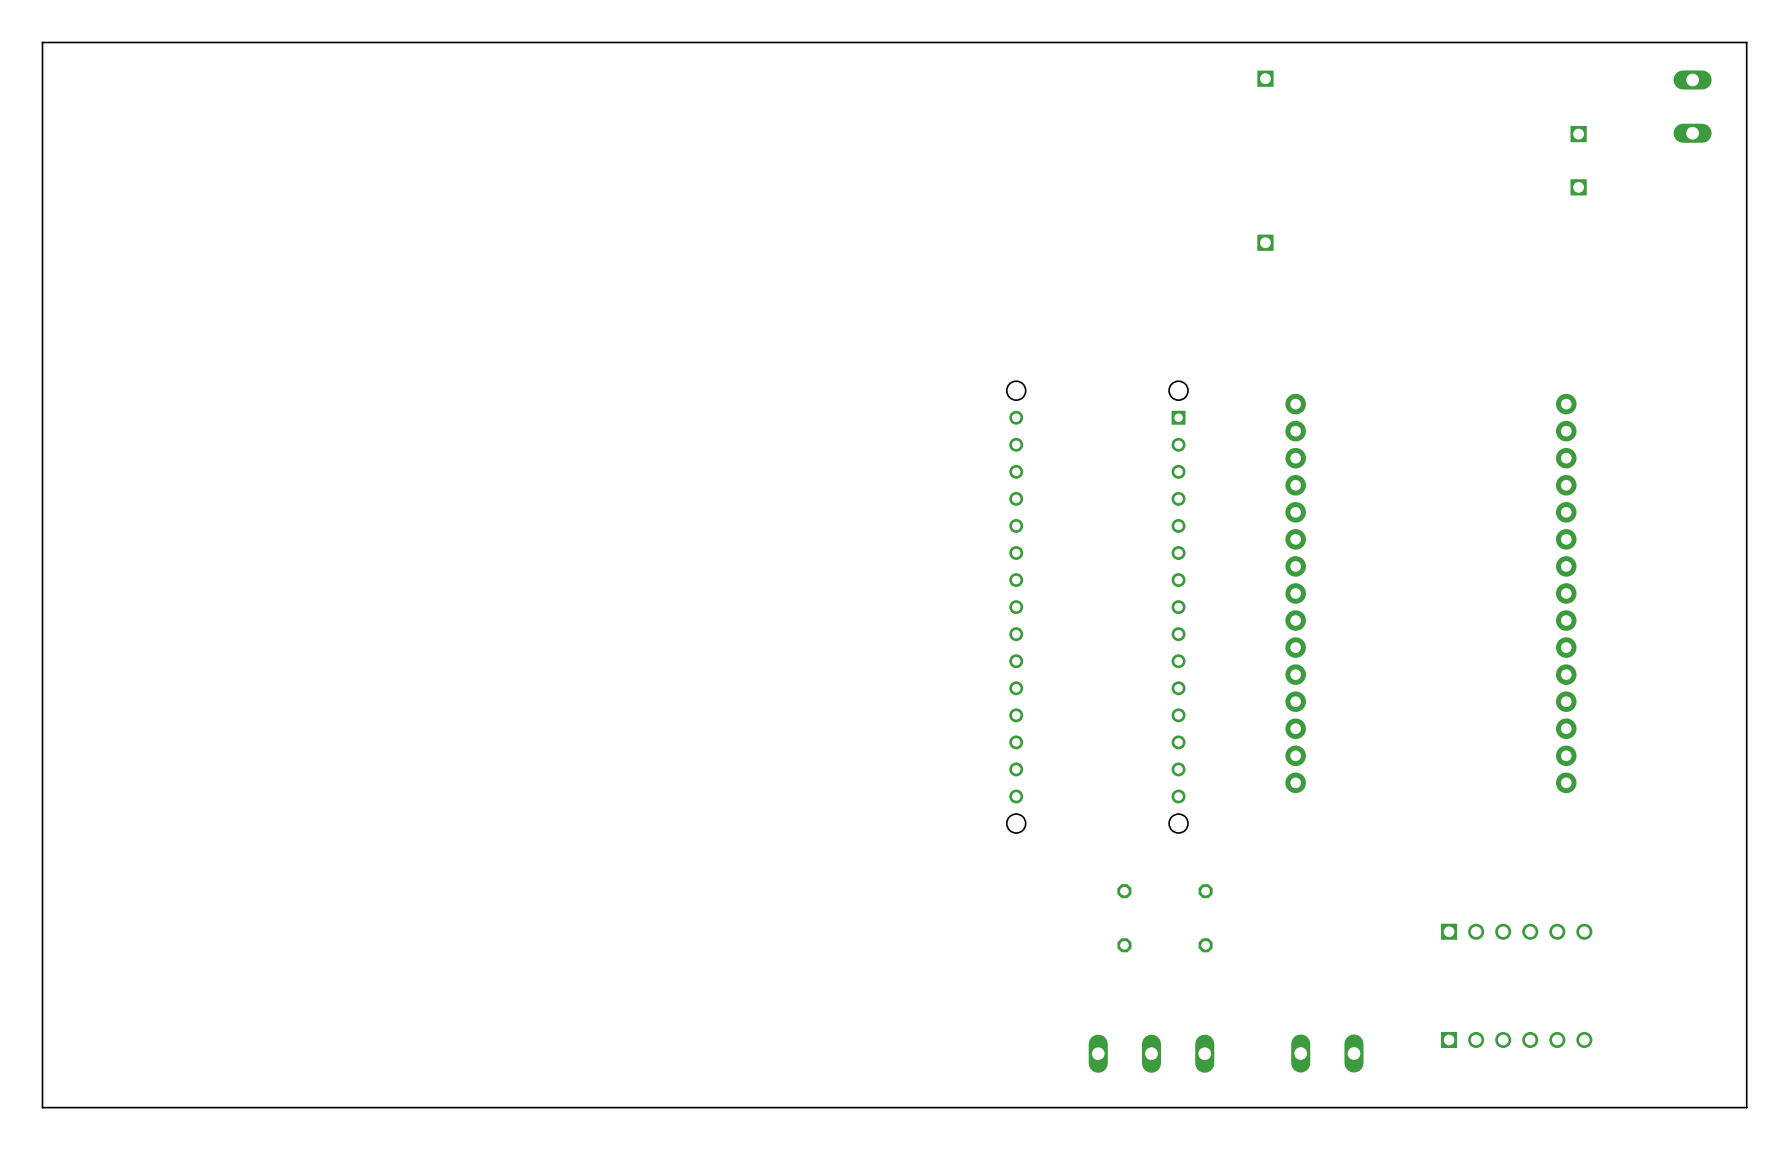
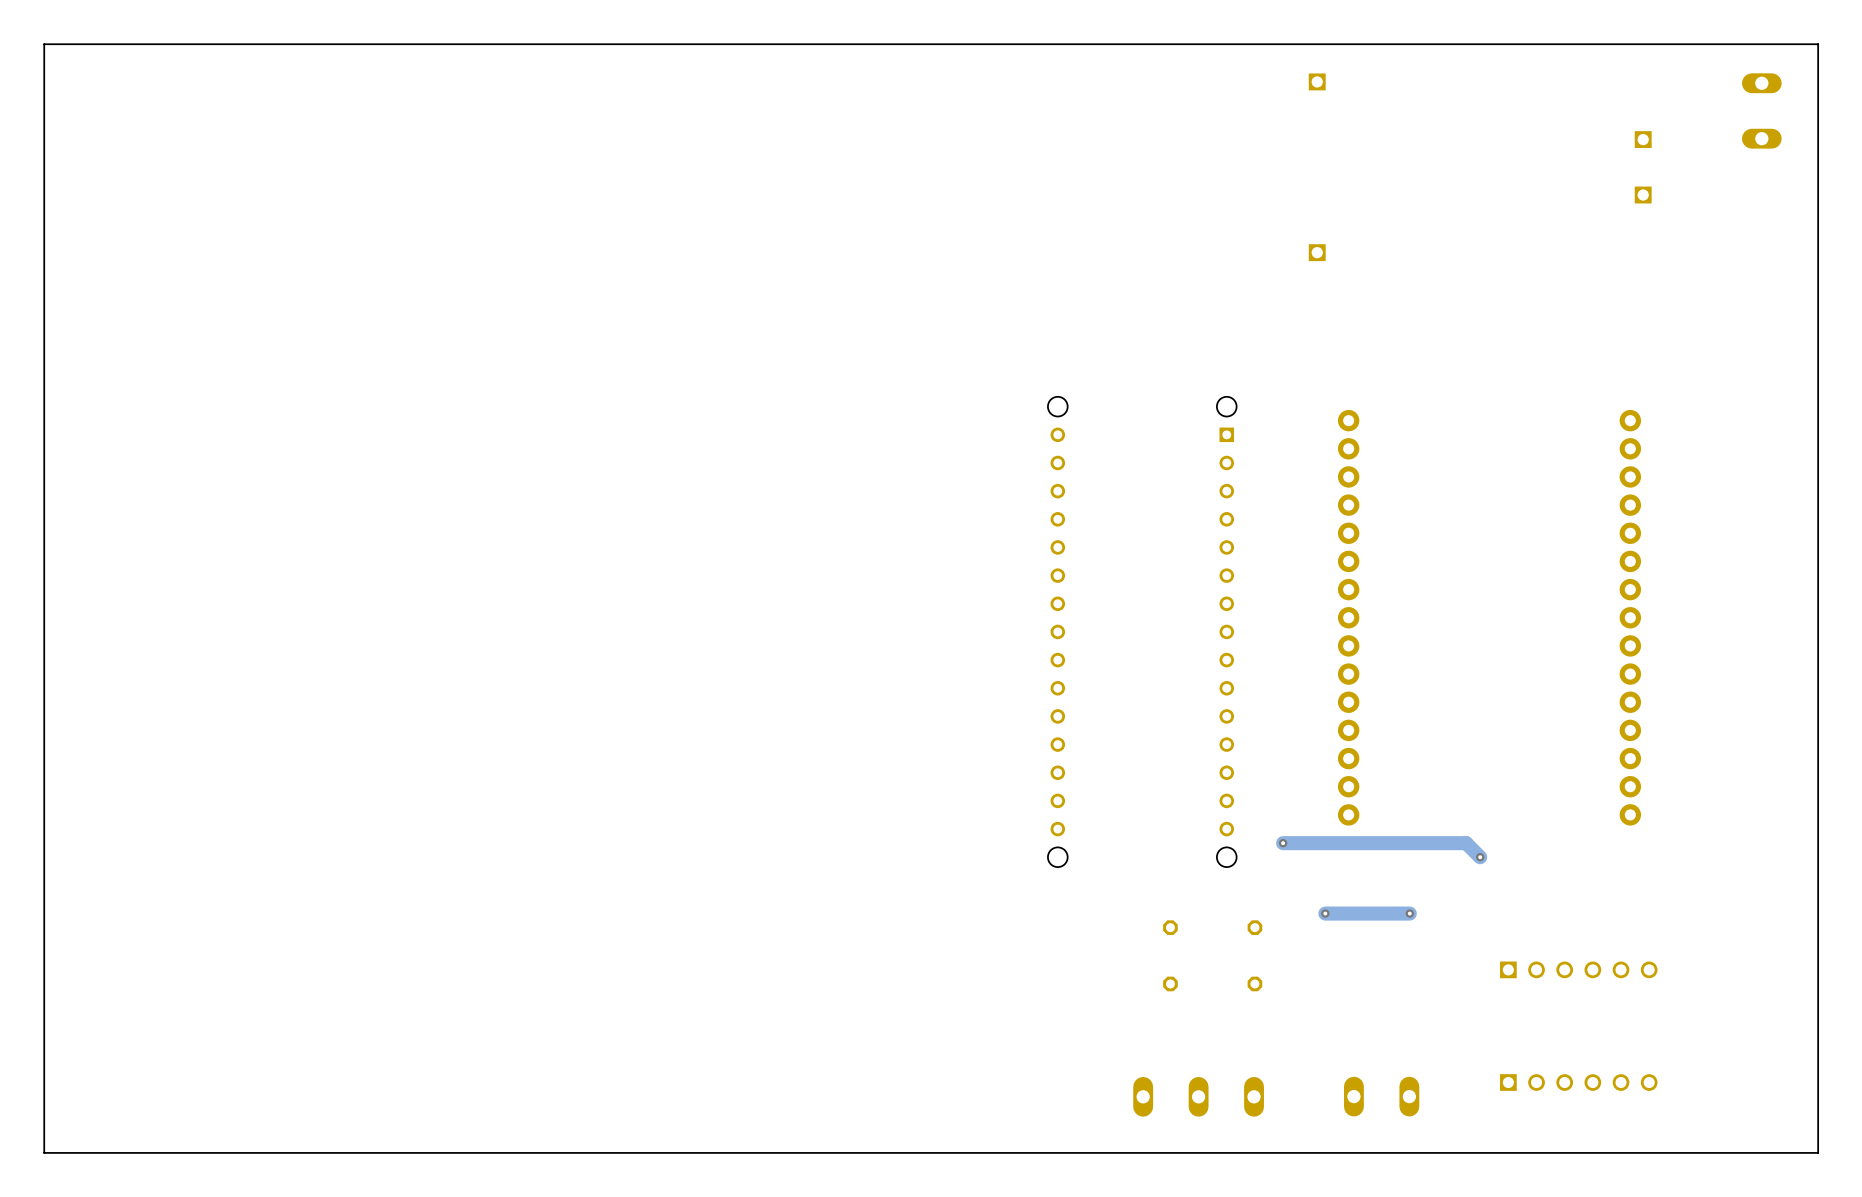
track: none -> (1283, 843) (1466, 843) (1480, 857)
via: none -> (1283, 843)
via: none -> (1480, 857)
via: none -> (1325, 913)
track: none -> (1409, 913) (1325, 913)
via: none -> (1409, 913)

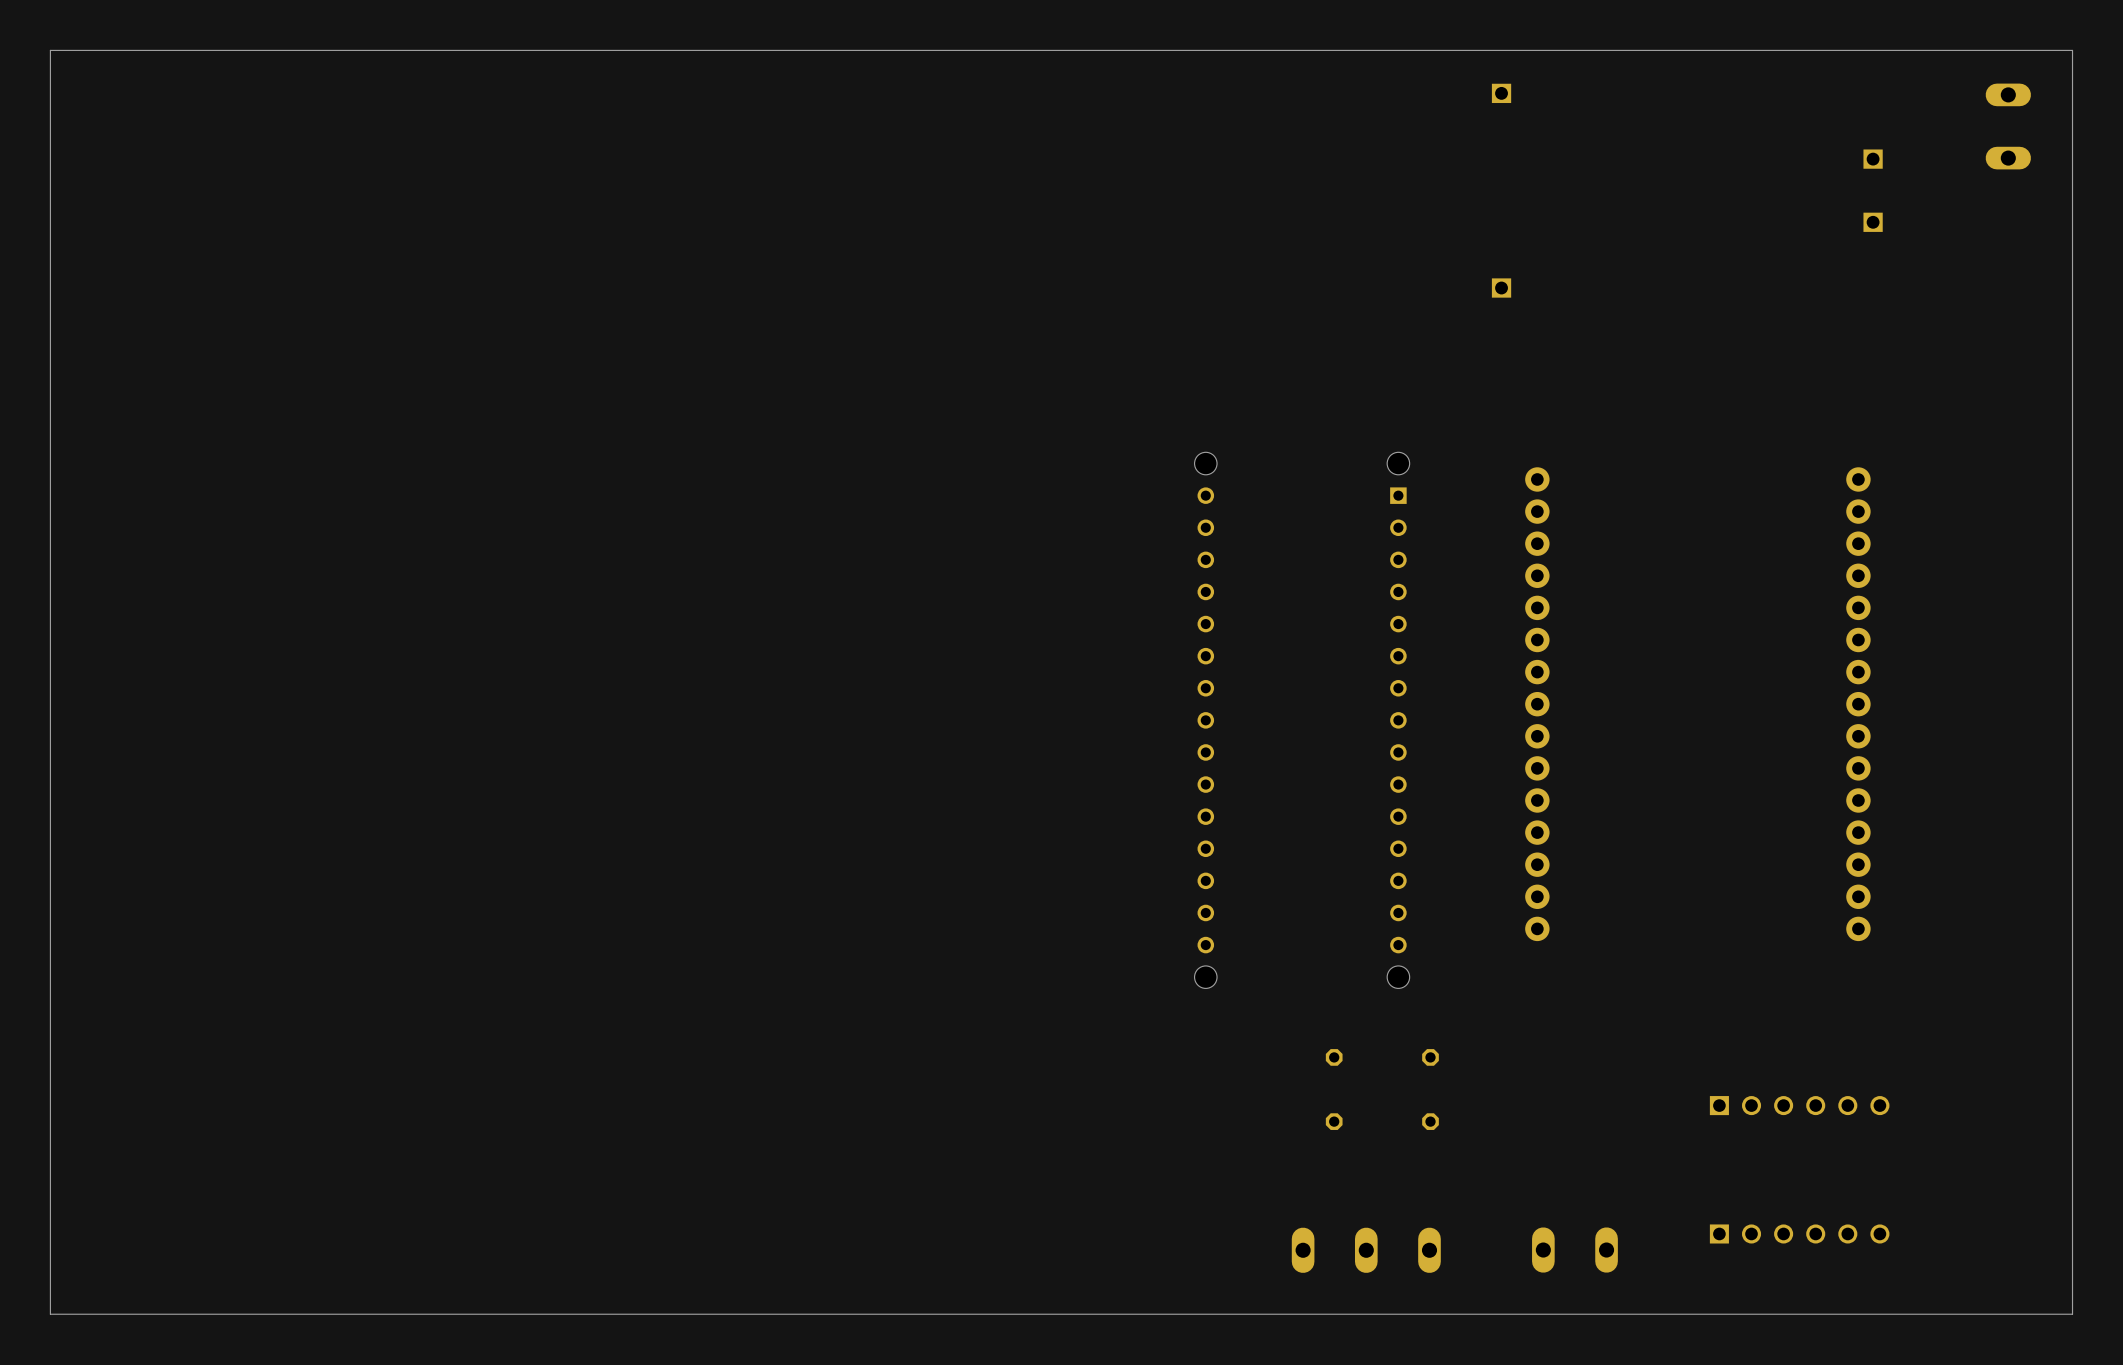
track: (1283, 843) (1466, 843) (1480, 857) -> none
via: (1283, 843) -> none
via: (1480, 857) -> none
via: (1325, 913) -> none
track: (1409, 913) (1325, 913) -> none
via: (1409, 913) -> none

